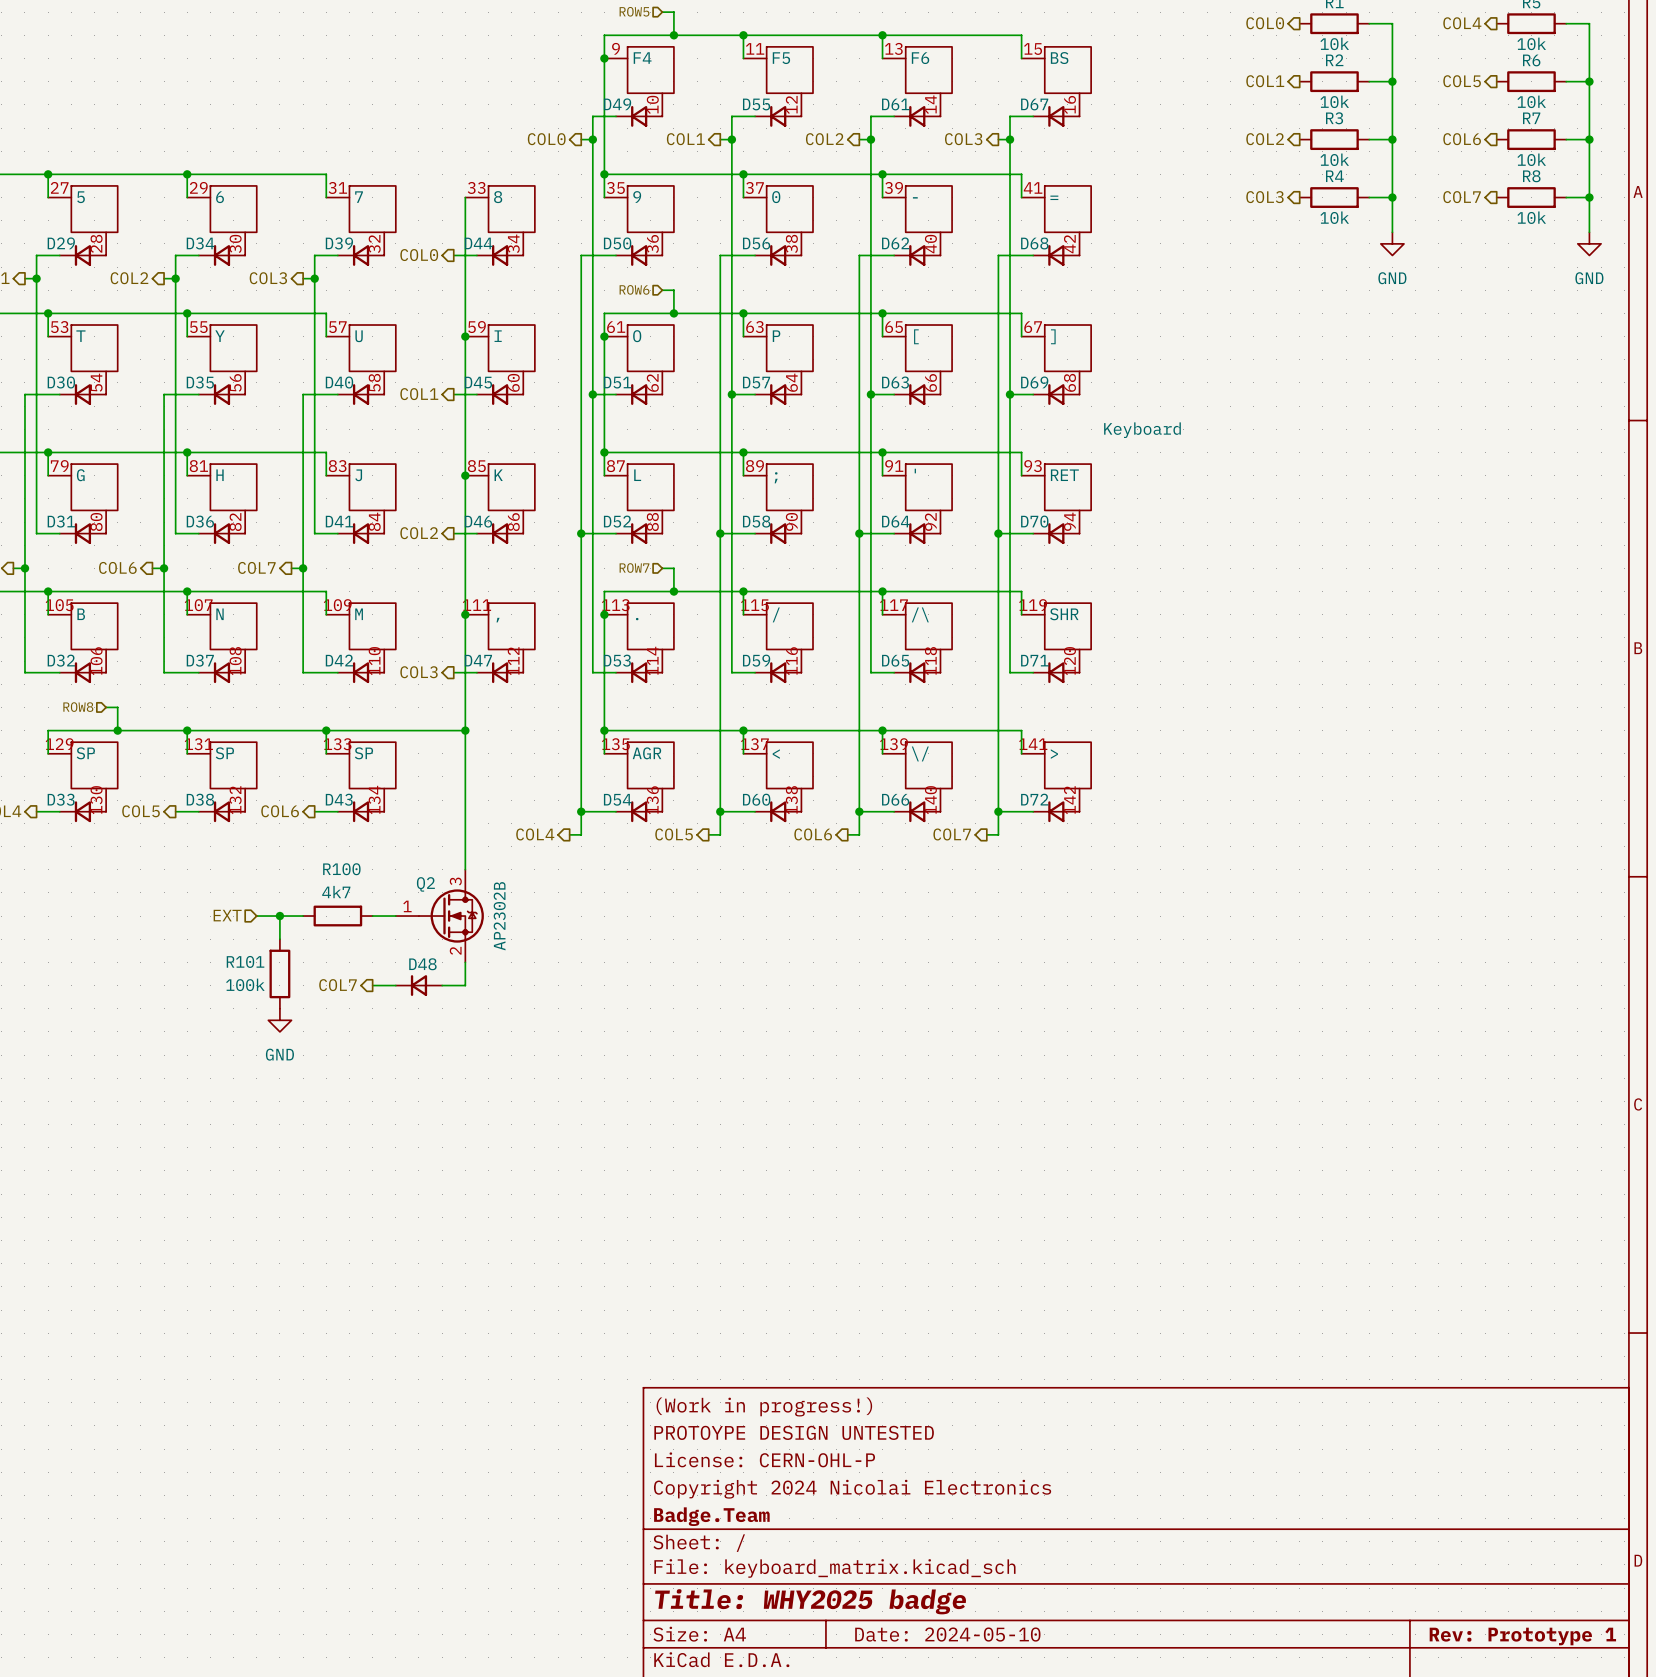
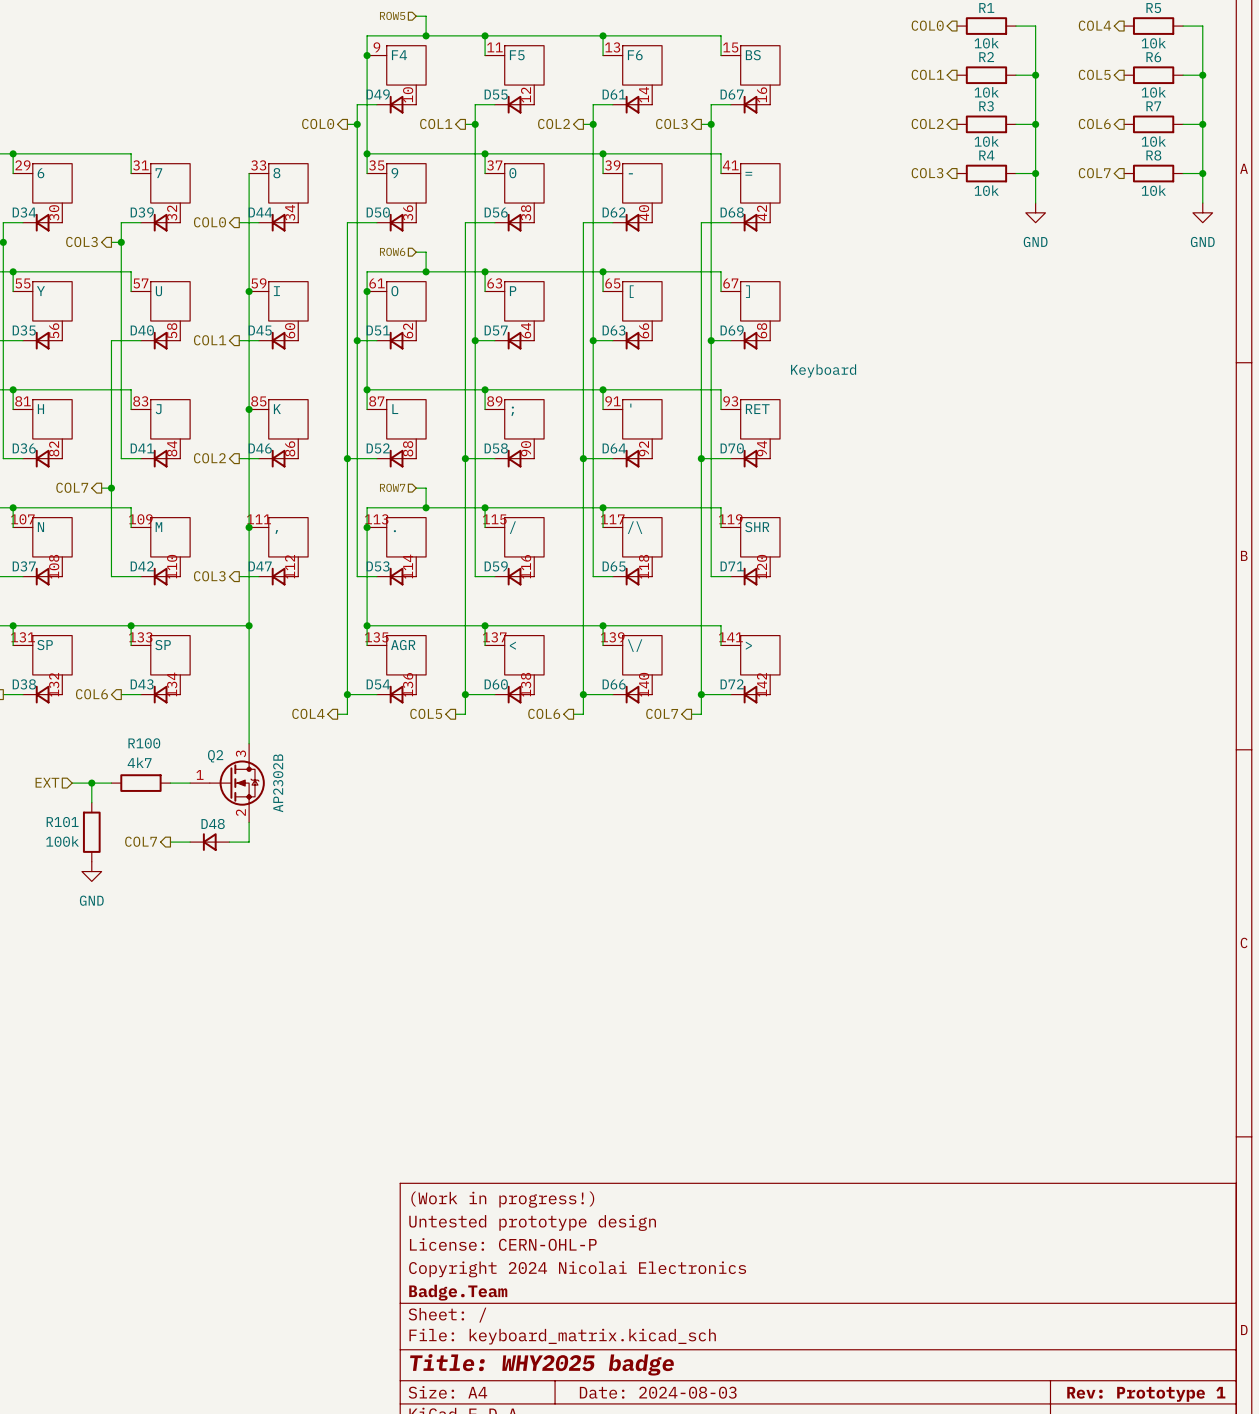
title block: PROTOYPE DESIGN UNTESTED (794, 1432) -> Untested prototype design (532, 1222)
title block: Date: 2024-05-10 (947, 1634) -> Date: 2024-08-03 (658, 1392)

